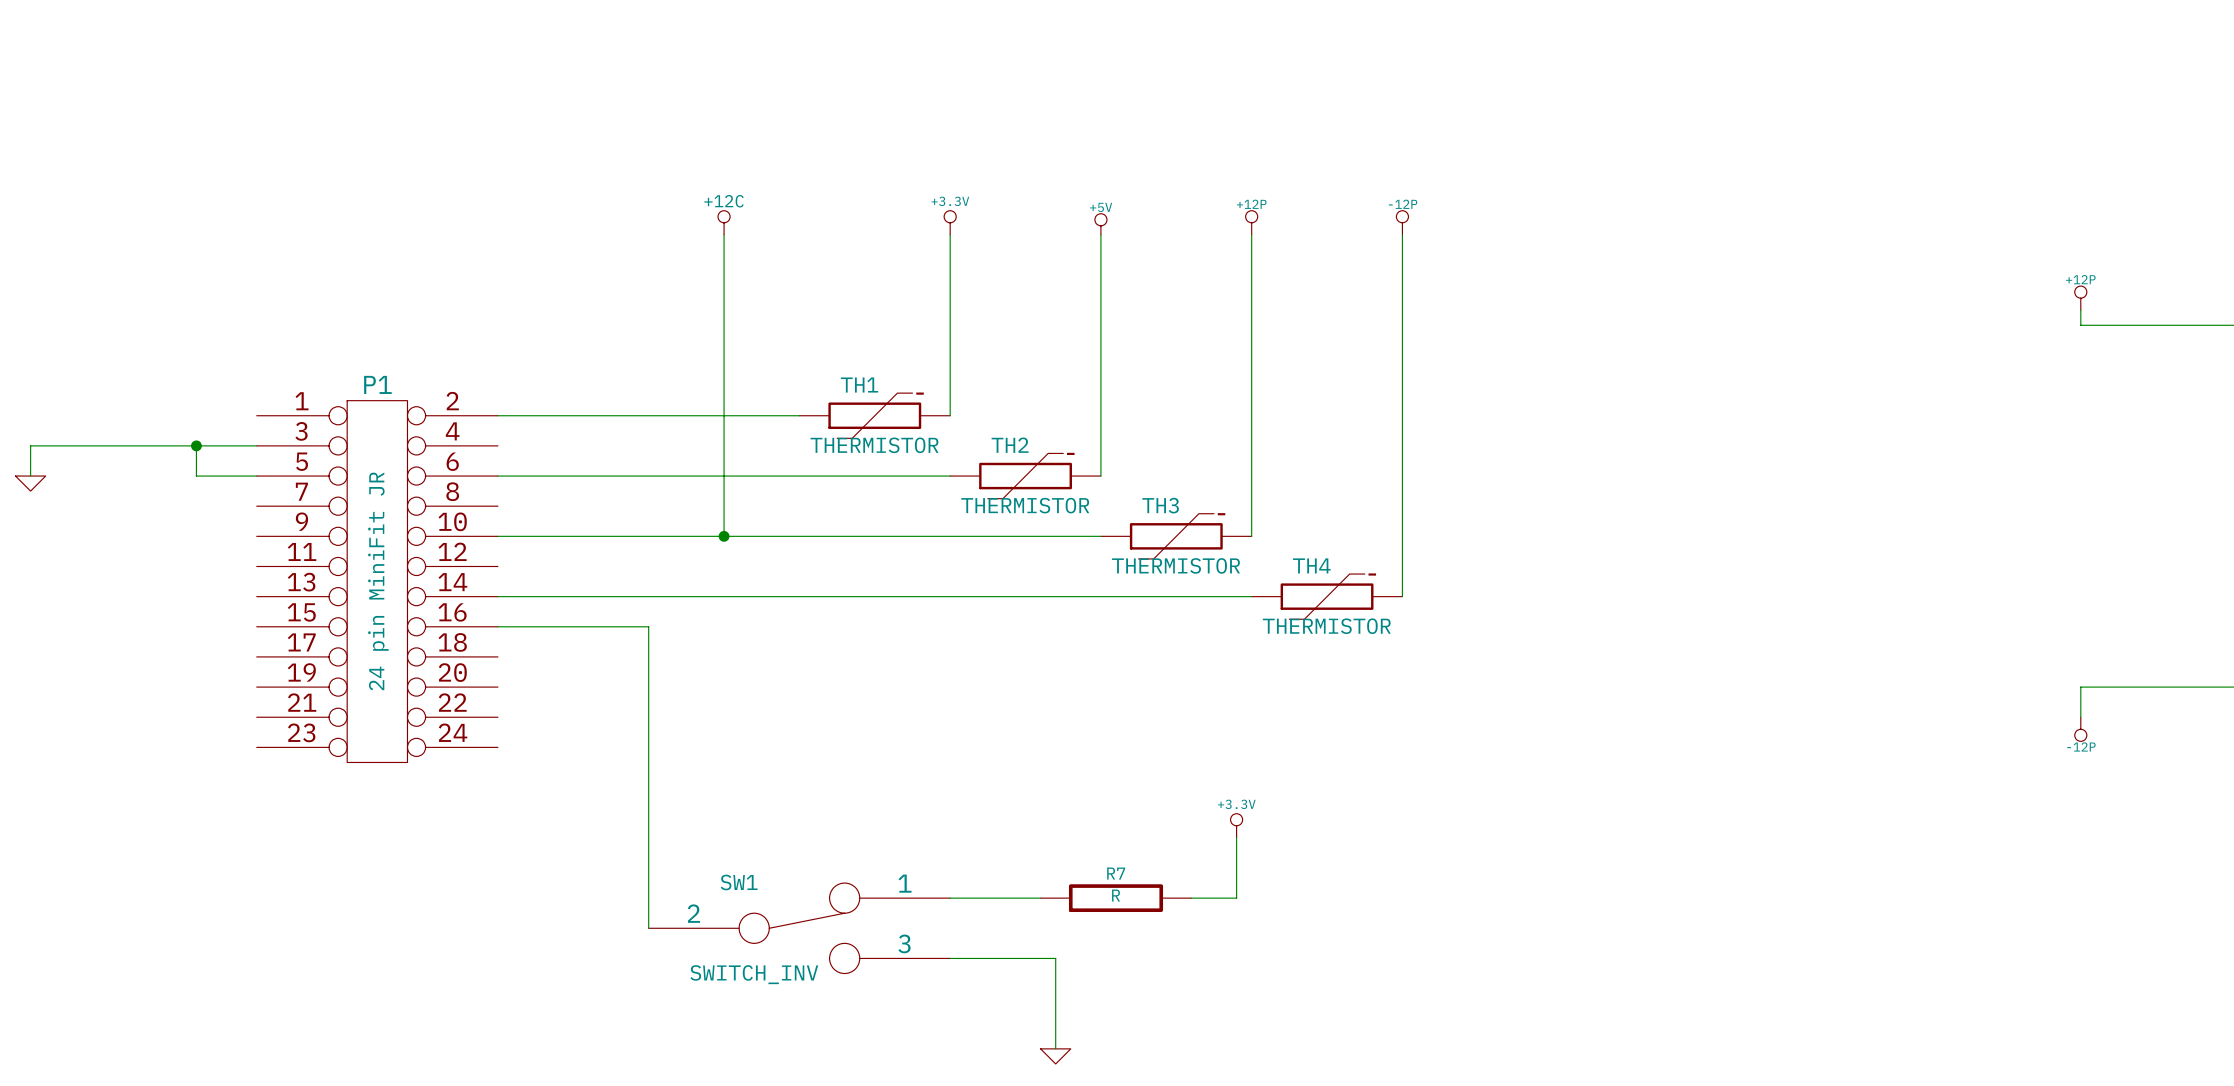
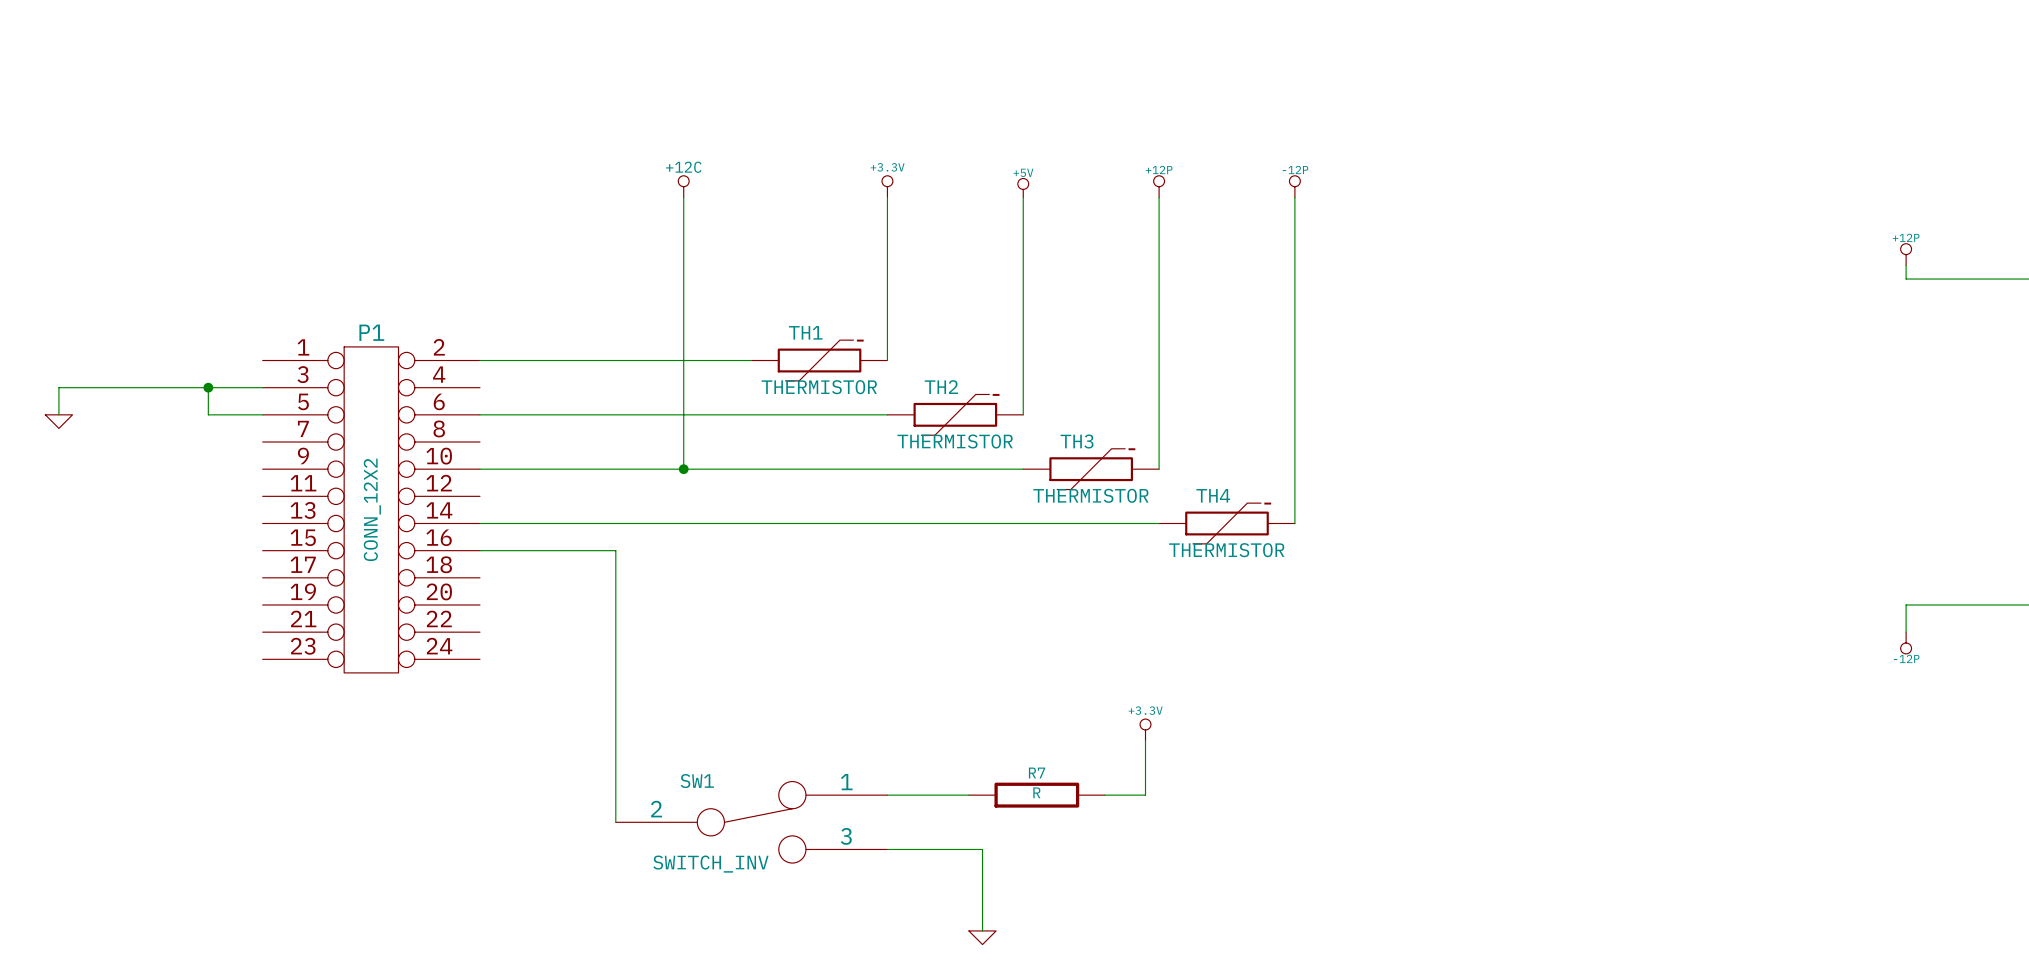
P1 value: 24 pin MiniFit JR (378, 581) -> CONN_12X2 (372, 509)

